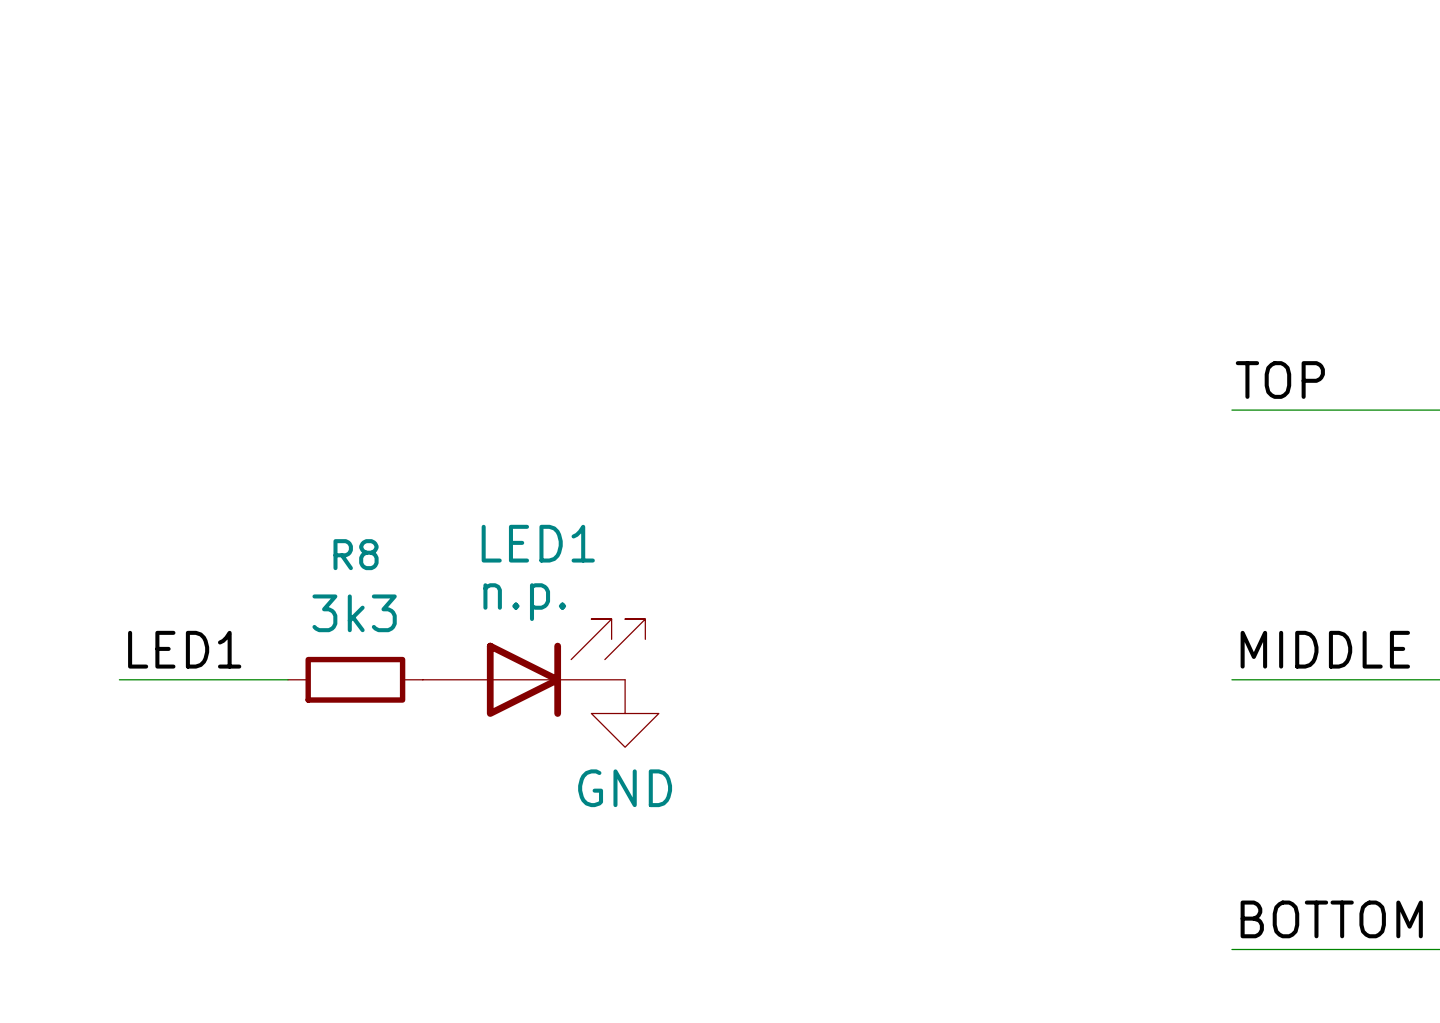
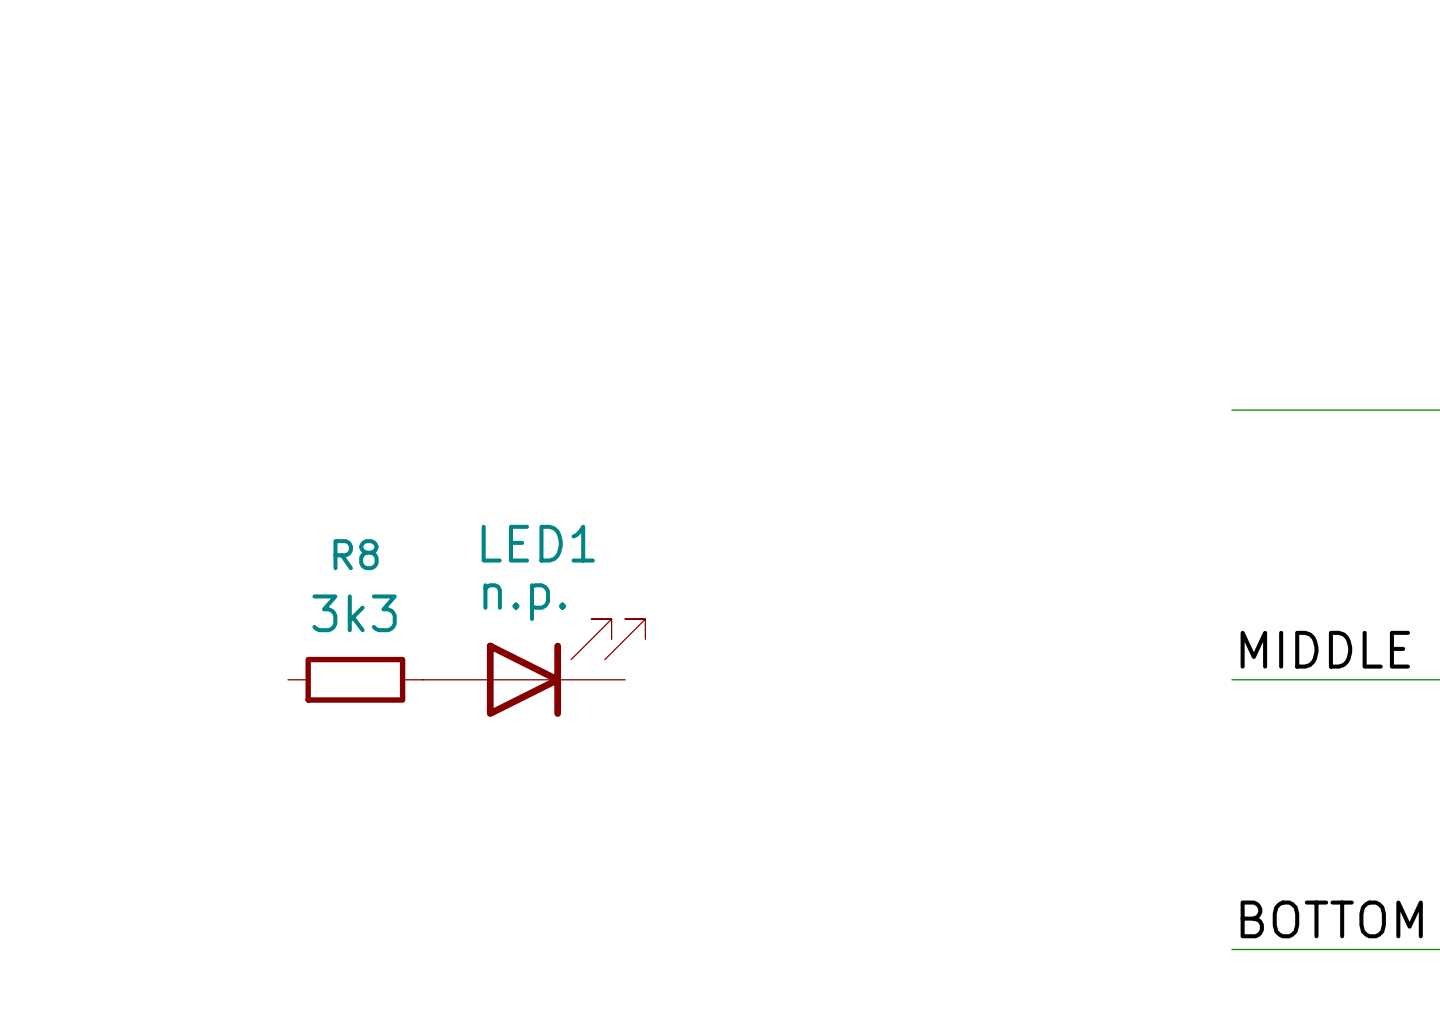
label: TOP (1280, 380) -> none
label: LED1 (184, 649) -> none
wire: (119, 679) (287, 679) -> none
power symbol: GND (625, 713) -> none

